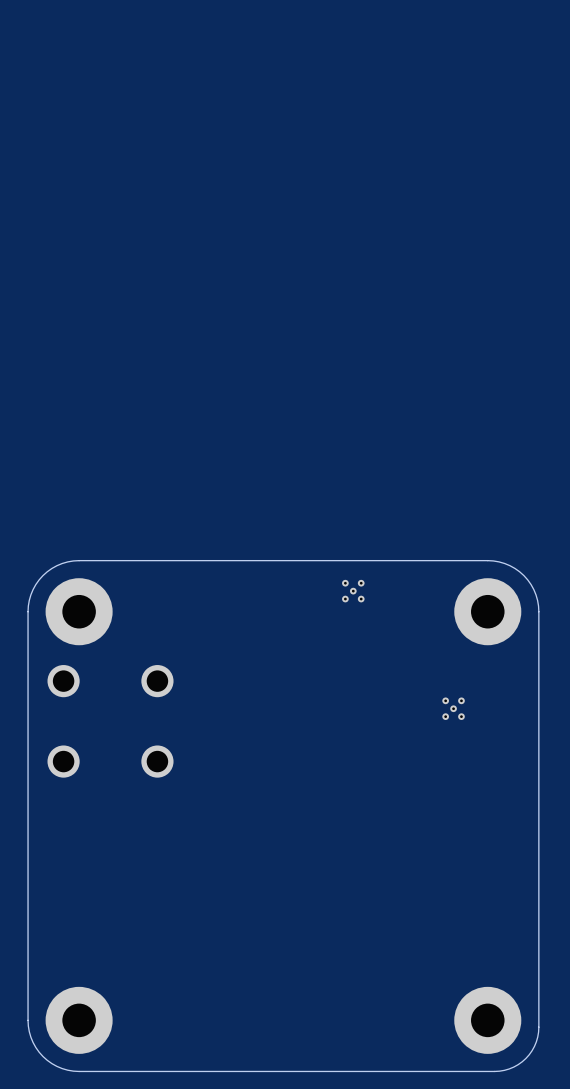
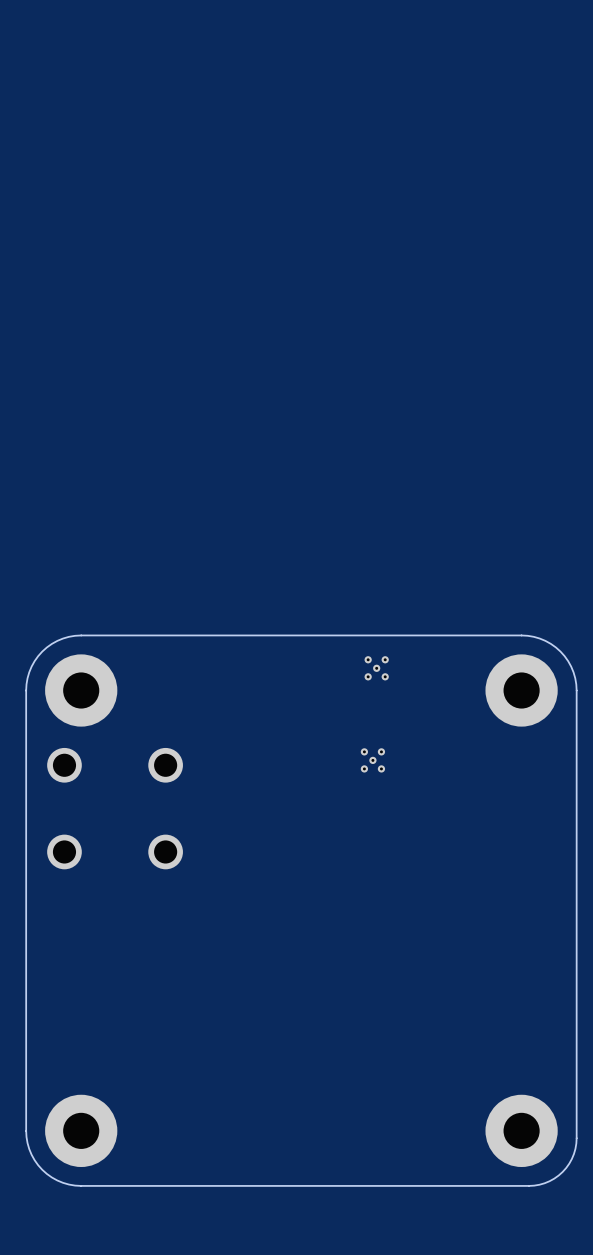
part position: (453, 708) -> (372, 760)

